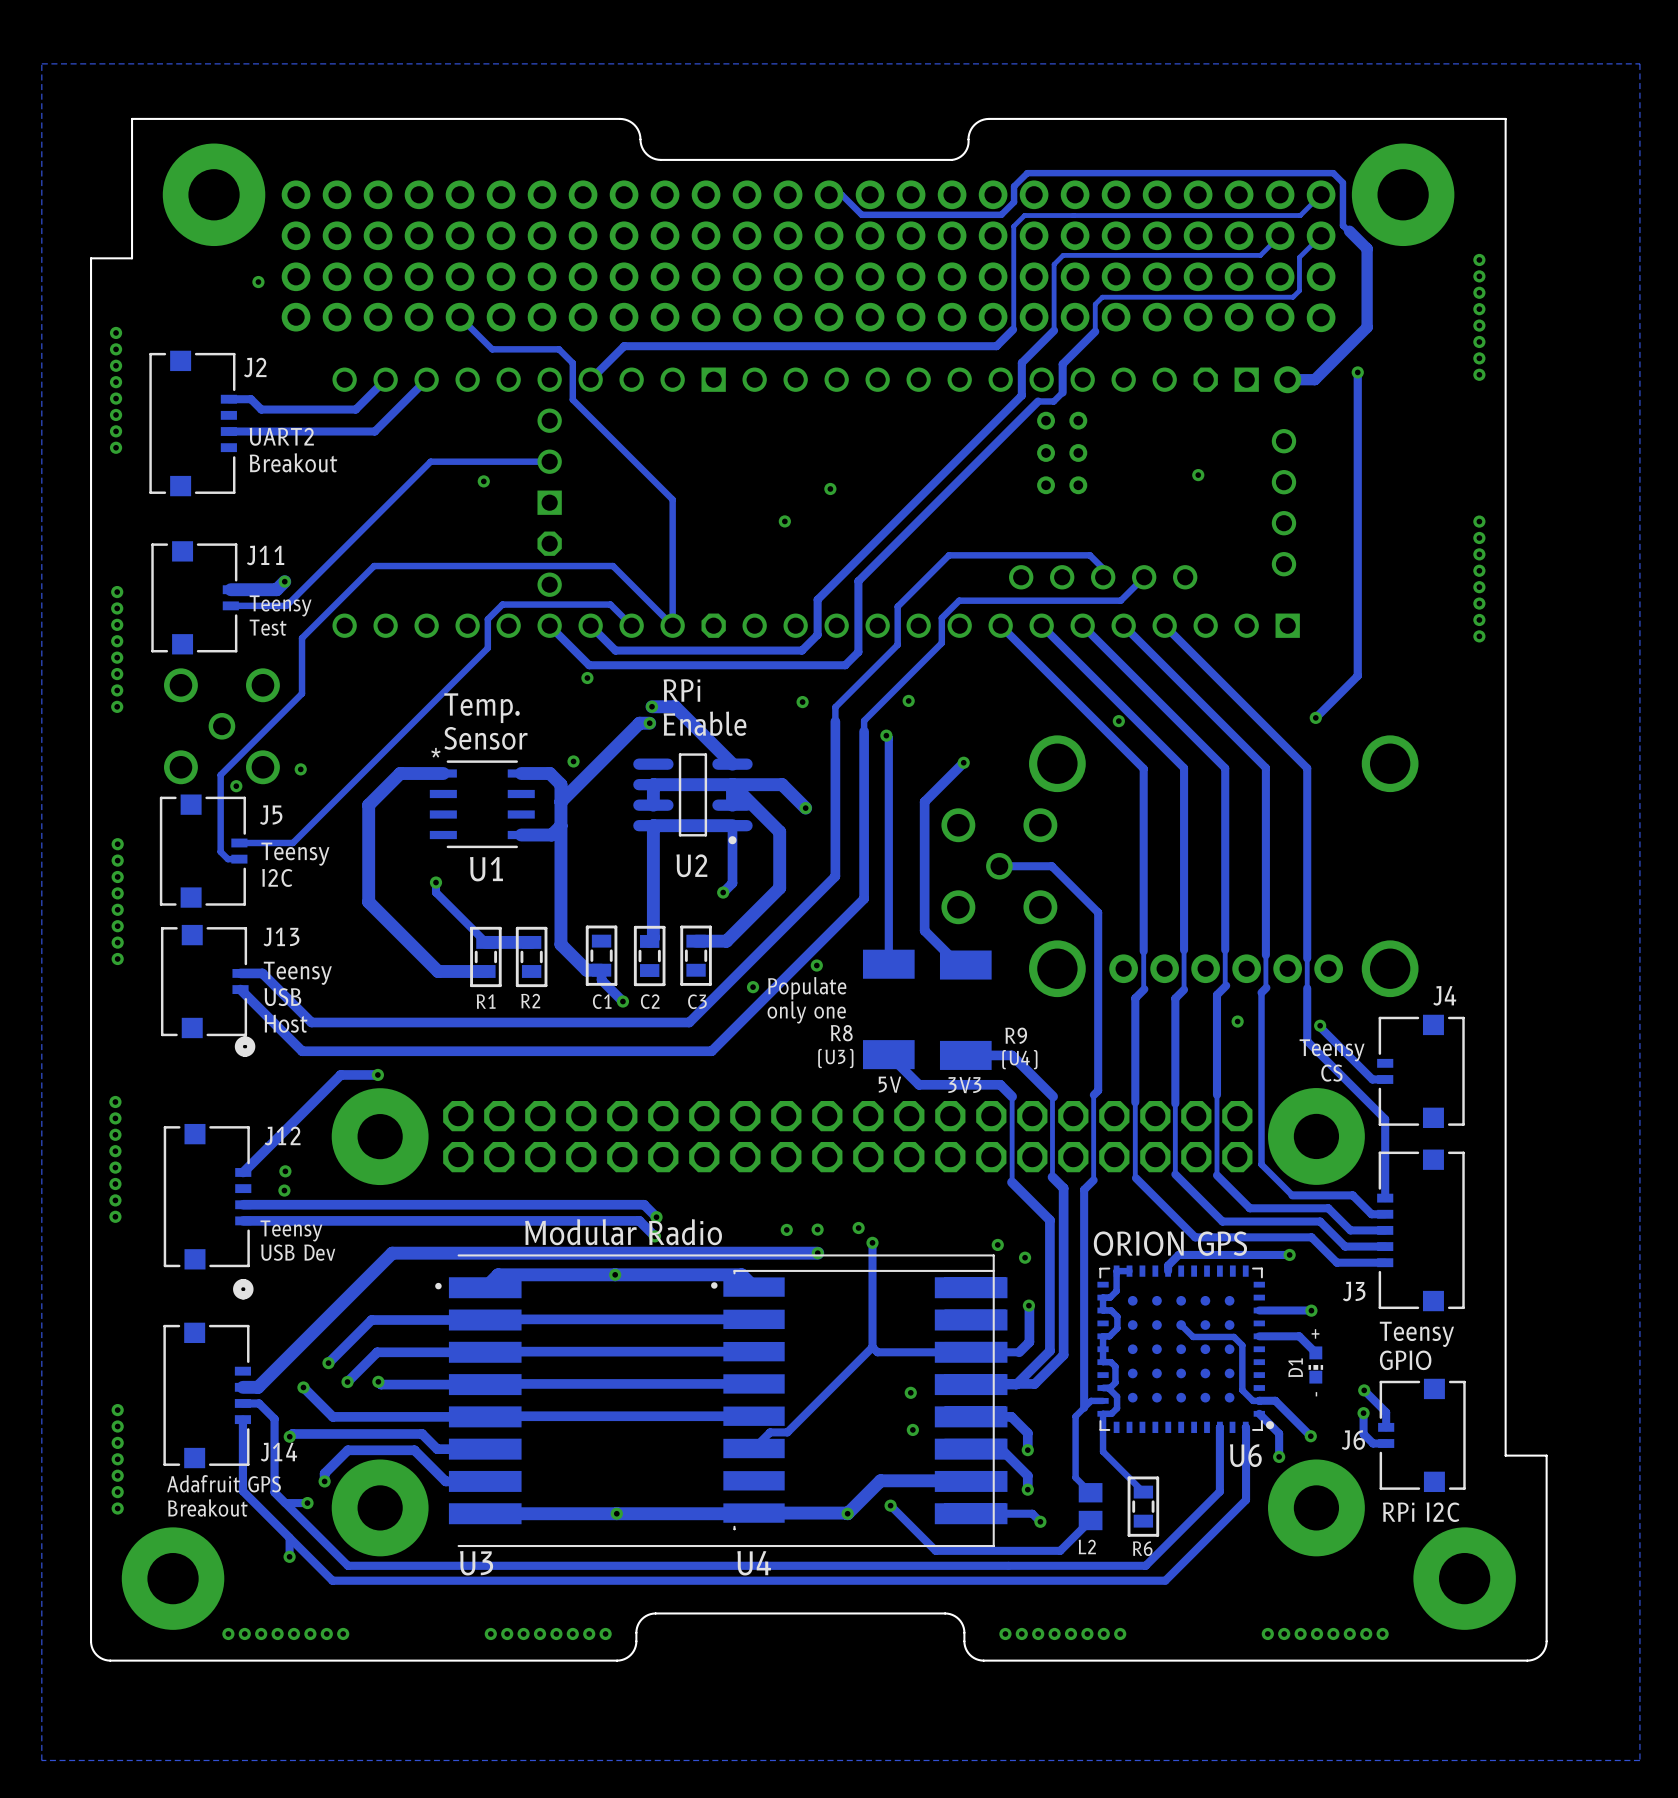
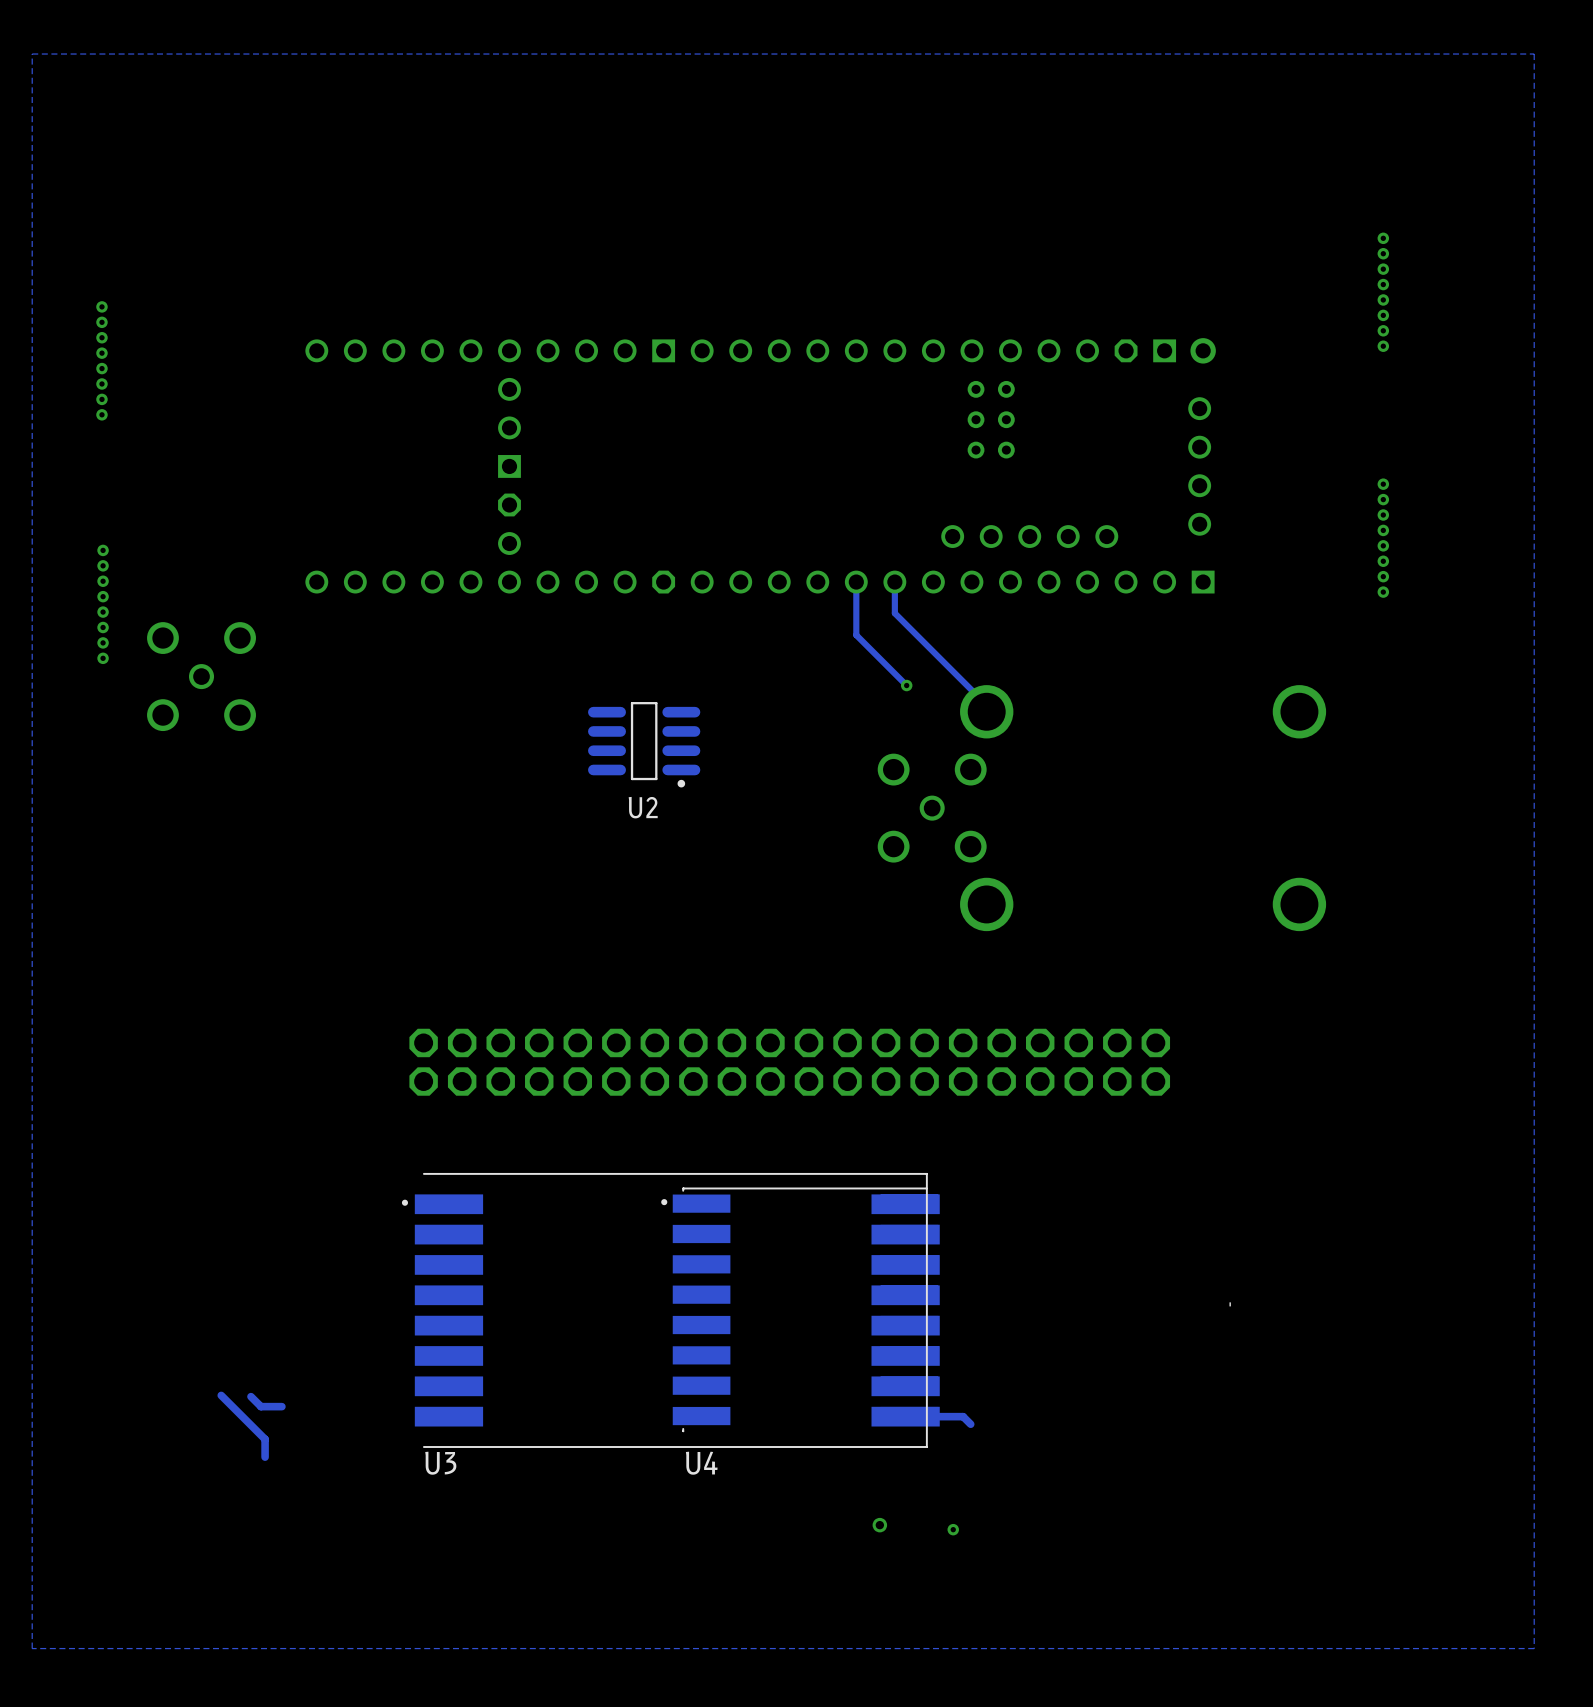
track: (829, 194) (841, 194) (861, 214) (1001, 214) (1014, 202) (1014, 186) (1027, 173) (1333, 173) (1342, 182) (1342, 225) (1367, 248) (1367, 327) (1314, 379) (1287, 379) -> none
track: (1321, 194) (1300, 215) (1024, 215) (1013, 226) (1013, 329) (996, 346) (624, 346) (590, 379) -> none
track: (1280, 235) (1260, 255) (1063, 255) (1054, 264) (1054, 330) (1021, 362) (1021, 395) (817, 599) (817, 634) (801, 650) (615, 650) (590, 625) -> none
track: (1321, 235) (1299, 257) (1299, 290) (1293, 297) (1102, 297) (1095, 304) (1095, 331) (1062, 364) (1062, 392) (1053, 401) (1038, 401) (858, 581) (858, 652) (845, 665) (589, 665) (549, 625) -> none
via: (258, 282) -> none
track: (460, 317) (492, 349) (559, 349) (572, 363) (572, 399) (672, 499) (672, 625) (612, 566) (374, 566) (302, 638) (302, 693) (220, 775) (220, 851) (227, 859) (239, 859) -> none
track: (1357, 372) (1357, 675) (1315, 717) -> none
via: (1357, 372) -> none
track: (385, 379) (355, 409) (261, 409) (251, 399) (228, 399) -> none
track: (426, 379) (374, 431) (228, 431) -> none
J2: (193, 423) -> none
text: UART2 (281, 436) -> none
track: (549, 461) (430, 461) (286, 605) (230, 605) -> none
text: Breakout (293, 462) -> none
via: (1198, 475) -> none
via: (483, 481) -> none
via: (830, 488) -> none
via: (784, 521) -> none
track: (1103, 577) (1103, 568) (1089, 555) (949, 555) (897, 606) (897, 644) (835, 707) (835, 876) (689, 1022) (311, 1022) (262, 973) (240, 973) -> none
track: (1144, 577) (1120, 600) (959, 600) (941, 618) (941, 643) (864, 720) (864, 898) (711, 1051) (302, 1051) (240, 989) -> none
track: (284, 581) (276, 589) (230, 589) -> none
via: (284, 581) -> none
J11: (195, 597) -> none
text: Teensy (280, 605) -> none
track: (631, 625) (610, 604) (502, 604) (487, 619) (487, 648) (292, 842) (239, 842) -> none
track: none -> (856, 582) (856, 635) (906, 685)
track: none -> (894, 582) (894, 613) (996, 715)
track: (1000, 625) (1143, 768) (1144, 989) (1135, 998) (1135, 1177) (1195, 1237) (1311, 1237) (1336, 1262) (1385, 1262) -> none
track: (1041, 625) (1184, 768) (1184, 989) (1175, 998) (1175, 1174) (1222, 1221) (1320, 1221) (1345, 1246) (1385, 1246) -> none
track: (1082, 625) (1225, 768) (1226, 985) (1216, 994) (1216, 1175) (1249, 1208) (1328, 1208) (1350, 1230) (1385, 1230) -> none
track: (1123, 625) (1265, 767) (1266, 987) (1261, 992) (1261, 1164) (1292, 1195) (1352, 1195) (1371, 1214) (1385, 1214) -> none
track: (1164, 625) (1307, 768) (1307, 958) -> none
text: Test (268, 627) -> none
via: (587, 678) -> none
text: RPi (681, 690) -> none
via: (908, 700) -> none
via: (802, 702) -> none
track: (651, 706) (675, 706) (732, 764) -> none
via: (651, 706) -> none
text: Temp. (482, 708) -> none
via: (1315, 717) -> none
via: (1118, 721) -> none
track: (649, 723) (639, 723) (560, 801) -> none
via: (649, 723) -> none
text: Enable (705, 723) -> none
track: (886, 735) (888, 738) (888, 964) -> none
via: (886, 735) -> none
text: Sensor (485, 738) -> none
via: (573, 761) -> none
track: (963, 762) (924, 801) (924, 930) (958, 965) (965, 965) -> none
via position: (963, 762) -> (906, 685)
via: (300, 769) -> none
track: (443, 773) (400, 773) (368, 805) (368, 902) (438, 971) (485, 971) -> none
track: (521, 773) (549, 773) (560, 784) (560, 944) (586, 970) (601, 970) (601, 980) (622, 1001) -> none
via: (236, 786) -> none
U1: (482, 804) -> none
track: (653, 805) (653, 784) (782, 784) (805, 808) -> none
track: (732, 805) (732, 784) (779, 831) (779, 888) (726, 941) (696, 941) -> none
via: (805, 808) -> none
track: (560, 825) (551, 835) (521, 835) -> none
via: (117, 844) -> none
J5: (203, 851) -> none
text: Teensy (295, 854) -> none
via: (117, 860) -> none
track: (999, 866) (1051, 866) (1098, 912) (1098, 1090) (1093, 1094) -> none
via: (117, 877) -> none
text: I2C (277, 877) -> none
track: (436, 882) (436, 892) (485, 942) (531, 942) -> none
via: (436, 882) -> none
part: (818, 889) -> none
track: (723, 892) (732, 883) (732, 825) (653, 825) (653, 937) (649, 941) -> none
via: (723, 892) -> none
via: (117, 893) -> none
via: (117, 909) -> none
via: (117, 926) -> none
via: (117, 942) -> none
C1: (601, 955) -> none
C2: (649, 955) -> none
C3: (696, 955) -> none
R1: (485, 956) -> none
R2: (531, 956) -> none
track: (1307, 957) (1307, 1041) (1385, 1119) (1385, 1198) -> none
via: (117, 959) -> none
via: (816, 965) -> none
part: (1226, 968) -> none
text: Teensy (297, 973) -> none
J13: (204, 981) -> none
via: (753, 987) -> none
text: Populate (807, 988) -> none
text: USB (282, 997) -> none
via: (622, 1001) -> none
R8: (888, 1009) -> none
R9: (965, 1010) -> none
text: only one (806, 1012) -> none
via: (1237, 1021) -> none
text: Host (285, 1023) -> none
track: (1320, 1025) (1372, 1079) (1385, 1079) -> none
via: (1320, 1025) -> none
part: (245, 1046) -> none
text: Teensy (1332, 1050) -> none
track: (888, 1054) (919, 1084) (1000, 1084) (1012, 1096) (1012, 1182) -> none
track: (965, 1055) (1011, 1055) (1053, 1096) (1052, 1177) (1063, 1188) (1063, 1355) (1034, 1383) (975, 1383) -> none
text: (U3) (835, 1058) -> none
text: (U4) (1019, 1059) -> none
J4: (1420, 1071) -> none
text: CS (1331, 1073) -> none
track: (377, 1074) (340, 1074) (243, 1172) -> none
via: (377, 1074) -> none
text: 5V (889, 1084) -> none
text: 3V3 (964, 1085) -> none
track: (1093, 1095) (1093, 1180) (1084, 1189) (1084, 1407) -> none
via: (115, 1101) -> none
via: (115, 1118) -> none
via: (115, 1134) -> none
via: (380, 1136) -> none
via: (1316, 1136) -> none
via: (115, 1151) -> none
via: (115, 1167) -> none
via: (285, 1171) -> none
track: (1011, 1182) (1049, 1220) (1049, 1351) (1016, 1384) (971, 1384) -> none
via: (115, 1184) -> none
via: (284, 1190) -> none
J12: (207, 1196) -> none
via: (115, 1200) -> none
track: (243, 1204) (644, 1204) (656, 1217) -> none
via: (115, 1216) -> none
via: (656, 1217) -> none
track: (243, 1220) (639, 1220) (654, 1236) -> none
via: (858, 1228) -> none
via: (786, 1229) -> none
via: (817, 1229) -> none
text: Teensy (291, 1230) -> none
J3: (1420, 1230) -> none
text: Modular Radio (623, 1232) -> none
via: (654, 1236) -> none
track: (872, 1242) (872, 1347) -> none
via: (872, 1242) -> none
text: ORION GPS (1170, 1243) -> none
via: (997, 1244) -> none
text: USB Dev (298, 1252) -> none
track: (817, 1253) (392, 1253) (258, 1387) (242, 1387) -> none
via: (817, 1253) -> none
track: (1289, 1254) (1178, 1254) (1168, 1265) (1168, 1271) -> none
via: (1289, 1254) -> none
via: (1025, 1257) -> none
track: (1129, 1271) (1116, 1271) (1116, 1291) (1110, 1297) (1103, 1297) (1103, 1310) (1111, 1310) (1117, 1316) (1117, 1328) (1109, 1336) (1103, 1336) (1103, 1362) (1110, 1362) (1115, 1366) (1115, 1382) (1110, 1387) (1103, 1387) -> none
via: (615, 1274) -> none
track: (754, 1287) (741, 1274) (498, 1274) (485, 1287) -> none
part: (243, 1289) -> none
track: (1028, 1305) (1029, 1342) (1019, 1352) (877, 1352) (872, 1347) -> none
via: (1028, 1305) -> none
track: (1311, 1310) (1259, 1310) -> none
via: (1311, 1310) -> none
track: (754, 1319) (371, 1320) (328, 1363) -> none
track: (1181, 1325) (1193, 1336) (1233, 1336) (1242, 1345) (1242, 1390) (1253, 1400) (1259, 1400) -> none
text: + (1315, 1333) -> none
text: Teensy (1416, 1334) -> none
track: (1259, 1336) (1299, 1336) (1315, 1352) -> none
track: (872, 1347) (787, 1432) (770, 1432) (754, 1448) -> none
U6: (1185, 1349) -> none
track: (754, 1351) (377, 1352) (347, 1382) -> none
text: GPIO (1405, 1360) -> none
via: (328, 1363) -> none
D1: (1315, 1365) -> none
track: (378, 1381) (381, 1384) (754, 1383) -> none
via: (378, 1381) -> none
via: (347, 1382) -> none
track: (303, 1387) (332, 1416) (754, 1416) -> none
via: (303, 1387) -> none
track: (1108, 1387) (1117, 1396) (1117, 1408) (1111, 1413) (1103, 1413) (1103, 1451) (1143, 1492) -> none
track: (1364, 1390) (1386, 1412) (1386, 1427) -> none
via: (1364, 1390) -> none
via: (910, 1392) -> none
J14: (207, 1395) -> none
track: (1103, 1400) (1091, 1400) (1075, 1416) (1075, 1477) (1090, 1492) -> none
track: (1259, 1400) (1275, 1400) (1310, 1436) -> none
track: (242, 1403) (259, 1403) (274, 1418) (274, 1492) (347, 1565) (1145, 1565) (1219, 1491) (1219, 1427) -> none
via: (117, 1410) -> none
track: (1259, 1413) (1279, 1433) (1279, 1456) -> none
track: (1363, 1413) (1363, 1433) (1373, 1443) (1386, 1443) -> none
via: (1363, 1413) -> none
track: (971, 1416) (1011, 1416) (1027, 1433) (1027, 1450) -> none
track: (242, 1419) (242, 1491) (332, 1580) (1165, 1580) (1246, 1500) (1245, 1427) -> none
via: (117, 1426) -> none
via: (912, 1429) -> none
J6: (1421, 1435) -> none
track: (289, 1436) (292, 1433) (422, 1433) (437, 1449) (485, 1449) -> none
via: (289, 1436) -> none
via: (1310, 1436) -> none
via: (117, 1442) -> none
track: (971, 1449) (1002, 1450) (1027, 1475) (1027, 1489) -> none
via: (1027, 1450) -> none
via: (1279, 1456) -> none
via: (117, 1459) -> none
via: (117, 1475) -> none
via: (324, 1481) -> none
track: (485, 1481) (445, 1481) (414, 1450) (347, 1450) (324, 1473) (324, 1481) -> none
track: (971, 1481) (975, 1480) (880, 1480) (847, 1513) (485, 1513) -> none
text: Adafruit GPS (224, 1483) -> none
via: (1027, 1489) -> none
via: (117, 1492) -> none
via: (307, 1503) -> none
track: (890, 1505) (935, 1550) (1060, 1550) (1090, 1520) -> none
via: (890, 1505) -> none
L2: (1090, 1506) -> none
R6: (1143, 1506) -> none
text: Breakout (207, 1507) -> none
via: (380, 1507) -> none
via: (1316, 1507) -> none
via: (117, 1508) -> none
text: RPi I2C (1421, 1512) -> none
via: (616, 1513) -> none
via: (847, 1513) -> none
via: (1040, 1521) -> none
via: (289, 1556) -> none
via: none -> (879, 1525)
via: (228, 1633) -> none
via: (244, 1633) -> none
via: (261, 1633) -> none
via: (277, 1633) -> none
via: (293, 1633) -> none
via: (310, 1633) -> none
via: (326, 1633) -> none
via: (343, 1633) -> none
via: (490, 1633) -> none
via: (507, 1633) -> none
via: (523, 1633) -> none
via: (540, 1633) -> none
via: (556, 1633) -> none
via: (572, 1633) -> none
via: (589, 1633) -> none
via: (605, 1633) -> none
via: (1005, 1633) -> none
via: (1038, 1633) -> none
via: (1054, 1633) -> none
via: (1071, 1633) -> none
via: (1087, 1633) -> none
via: (1103, 1633) -> none
via: (1120, 1633) -> none
via: (1267, 1633) -> none
via: (1284, 1633) -> none
via: (1300, 1633) -> none
via: (1317, 1633) -> none
via: (1333, 1633) -> none
via: (1349, 1633) -> none
via: (1366, 1633) -> none
via: (1382, 1633) -> none

